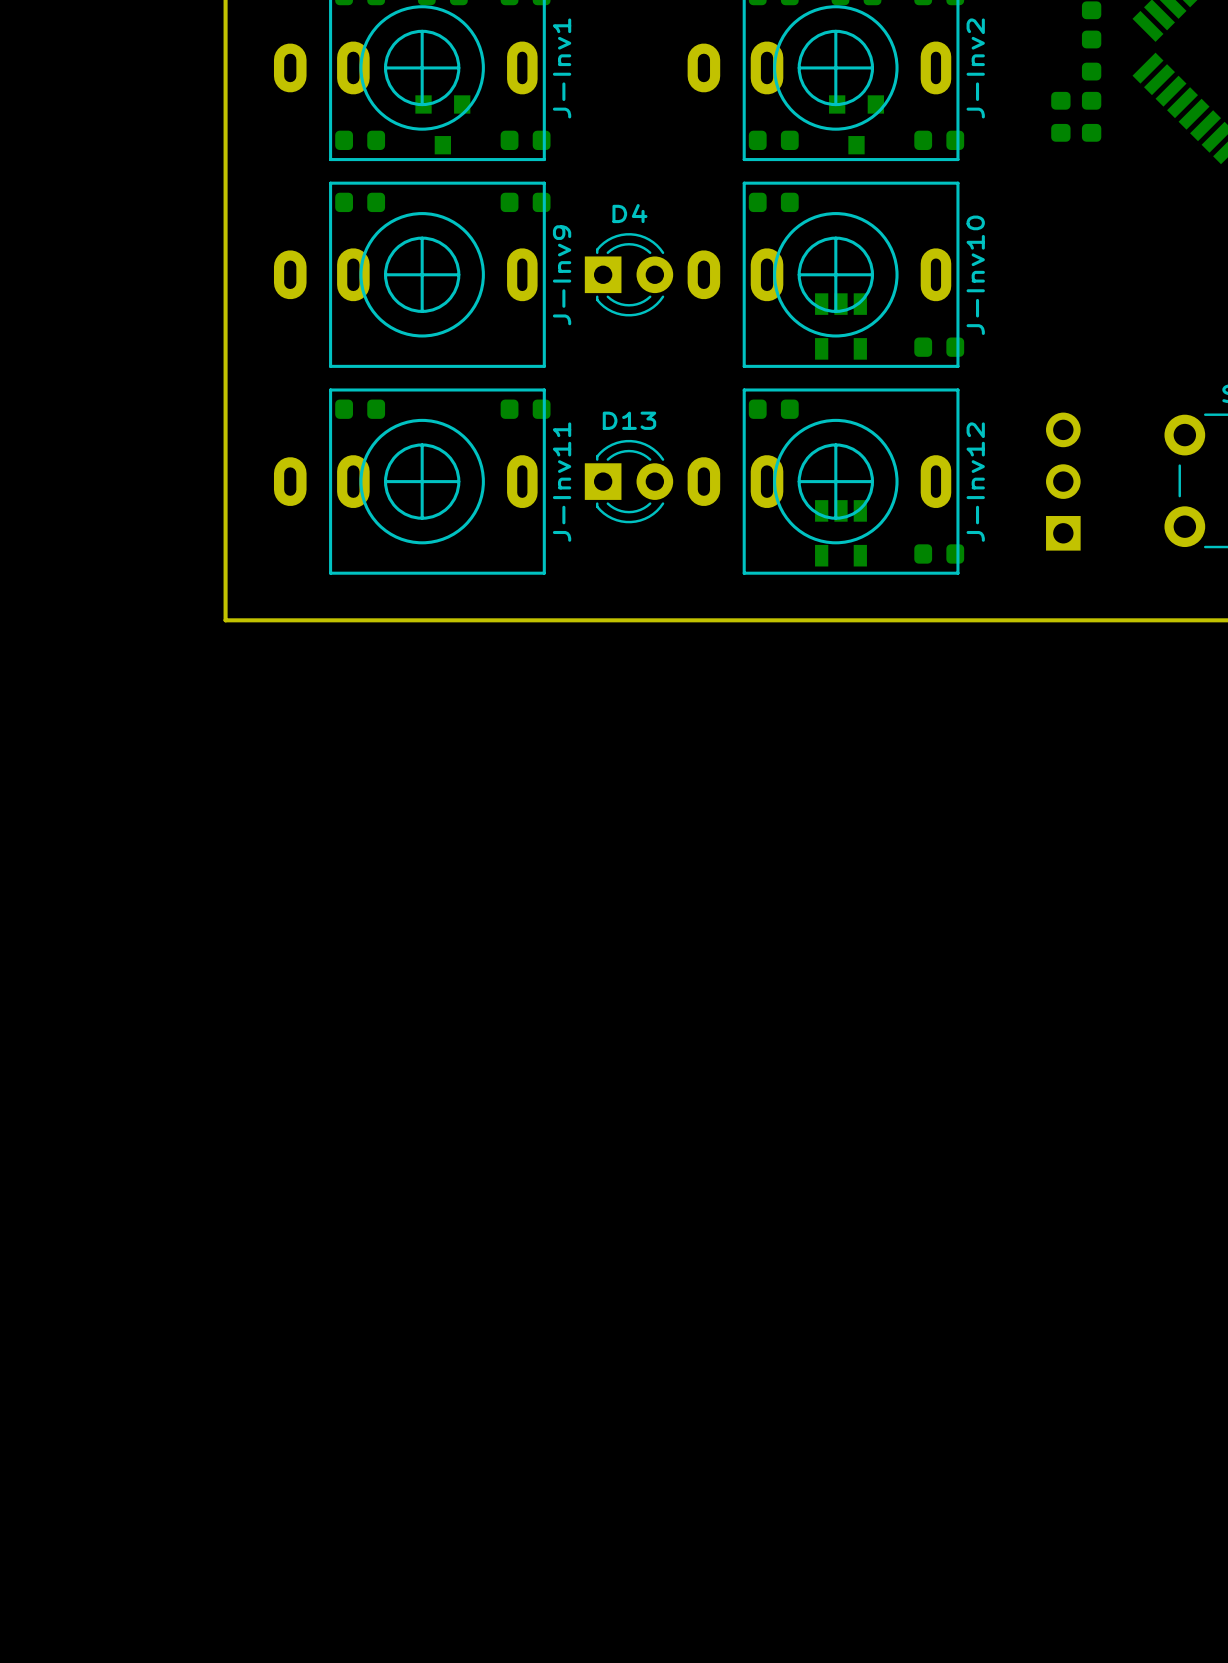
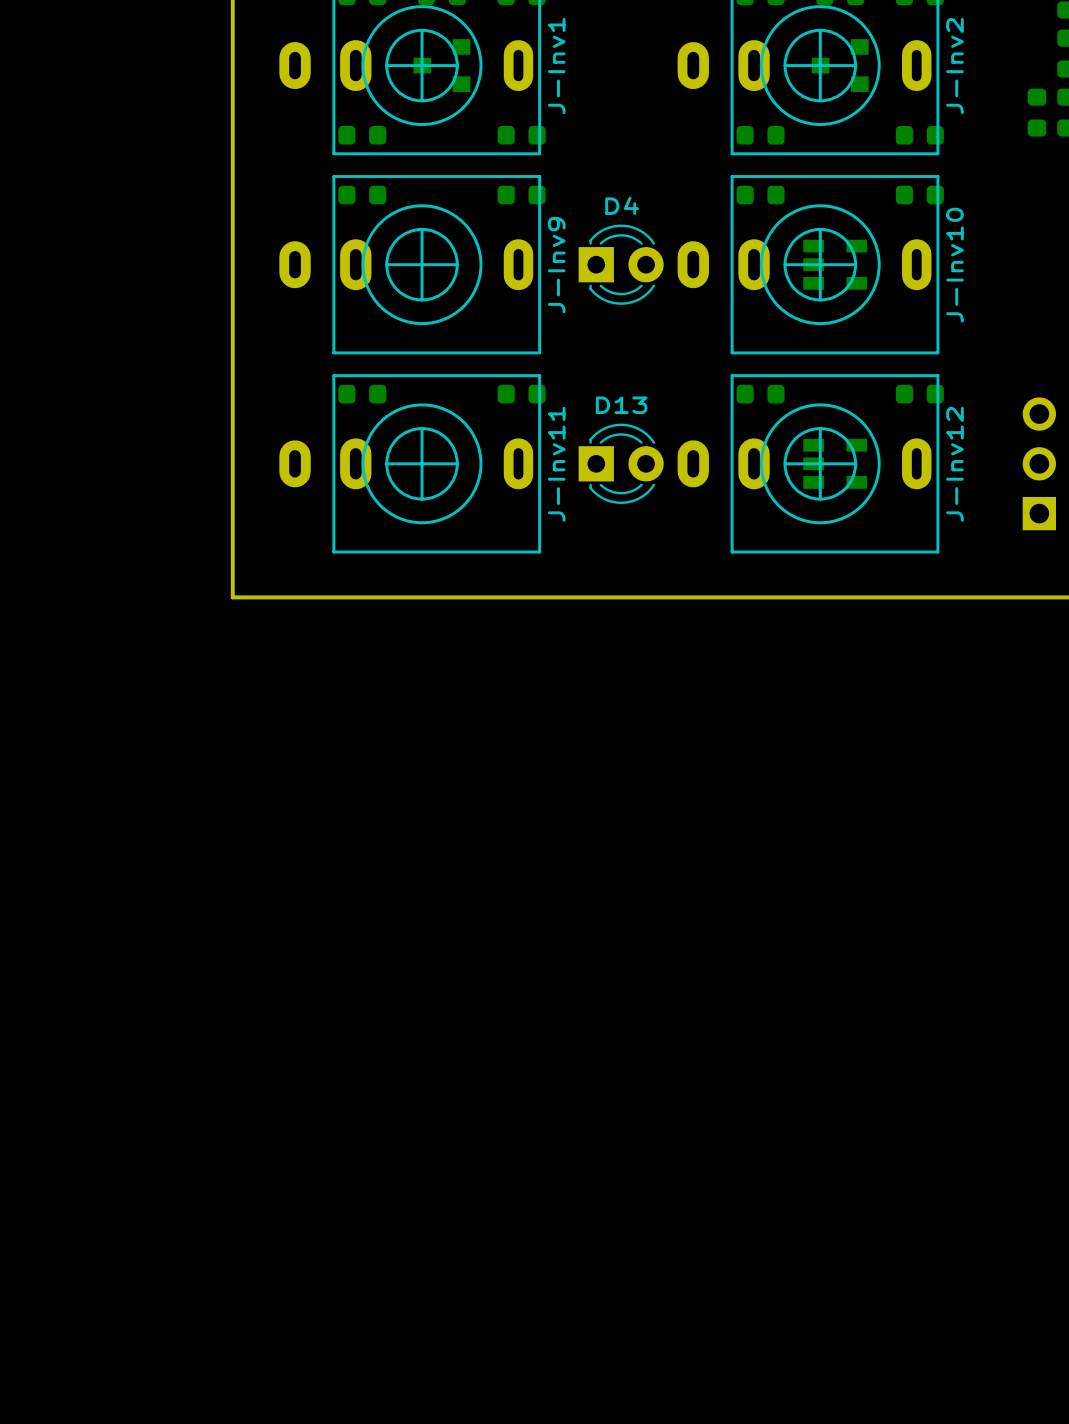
part rotation: 0° (442, 124) -> 90° clockwise (441, 65)
part position: (442, 124) -> (441, 65)
part rotation: 0° (856, 124) -> 90° clockwise (840, 65)
part position: (856, 124) -> (840, 65)
part: none -> (919, 195)
part rotation: 0° (840, 326) -> 90° counterclockwise (835, 264)
part position: (840, 326) -> (835, 264)
part position: (939, 347) -> (919, 394)
part rotation: 0° (840, 533) -> 90° counterclockwise (835, 463)
part position: (840, 533) -> (835, 463)
part: (939, 553) -> none

